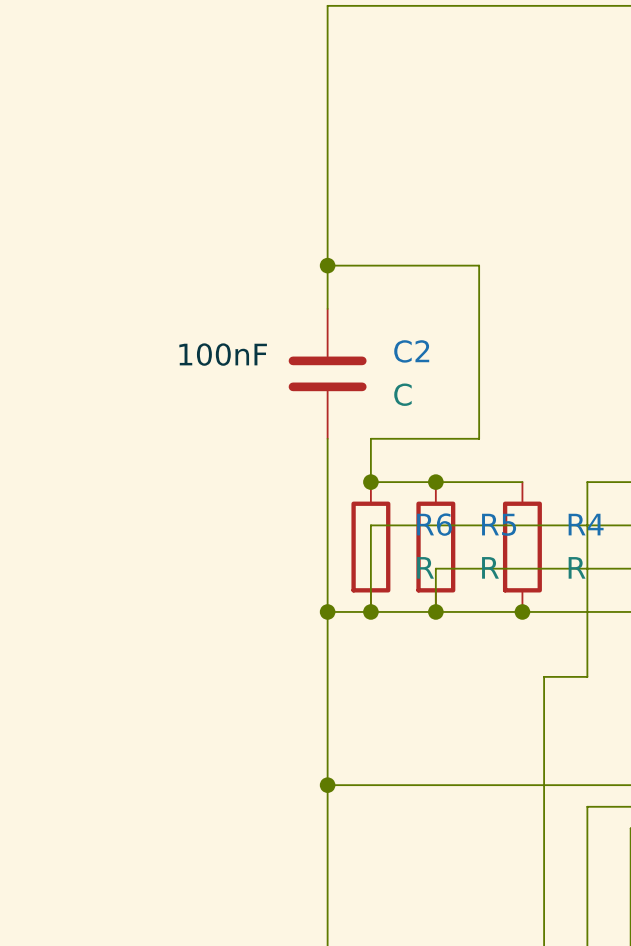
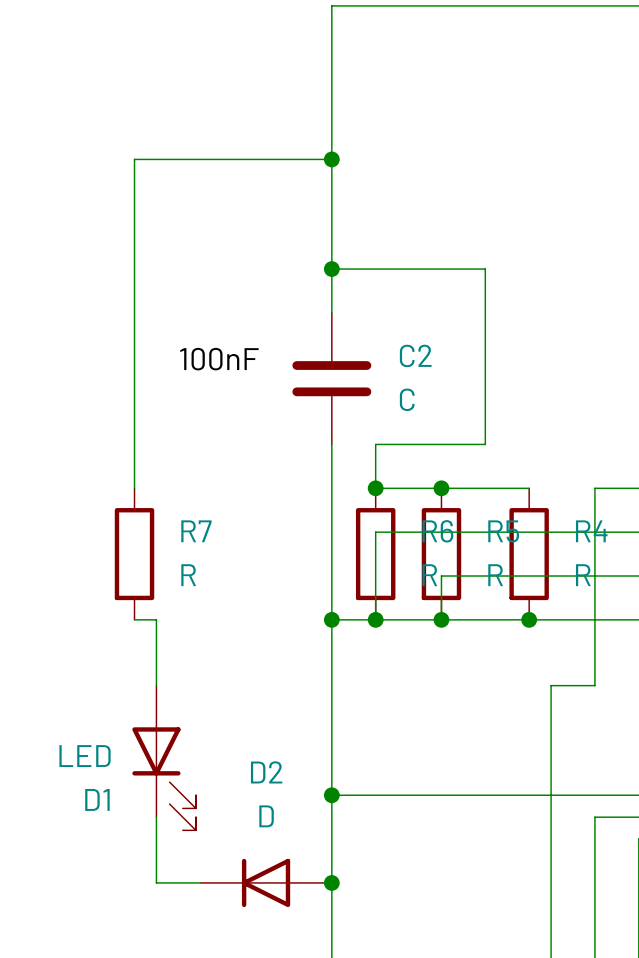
wire: none -> (331, 159) (134, 159) (134, 488)
junction: none -> (331, 159)
R7: none -> R (134, 554)
wire: none -> (134, 619) (156, 619) (156, 685)
D1: none -> LED (164, 757)
wire: none -> (156, 817) (156, 882) (200, 882)
D2: none -> D (266, 882)
junction: none -> (331, 882)

